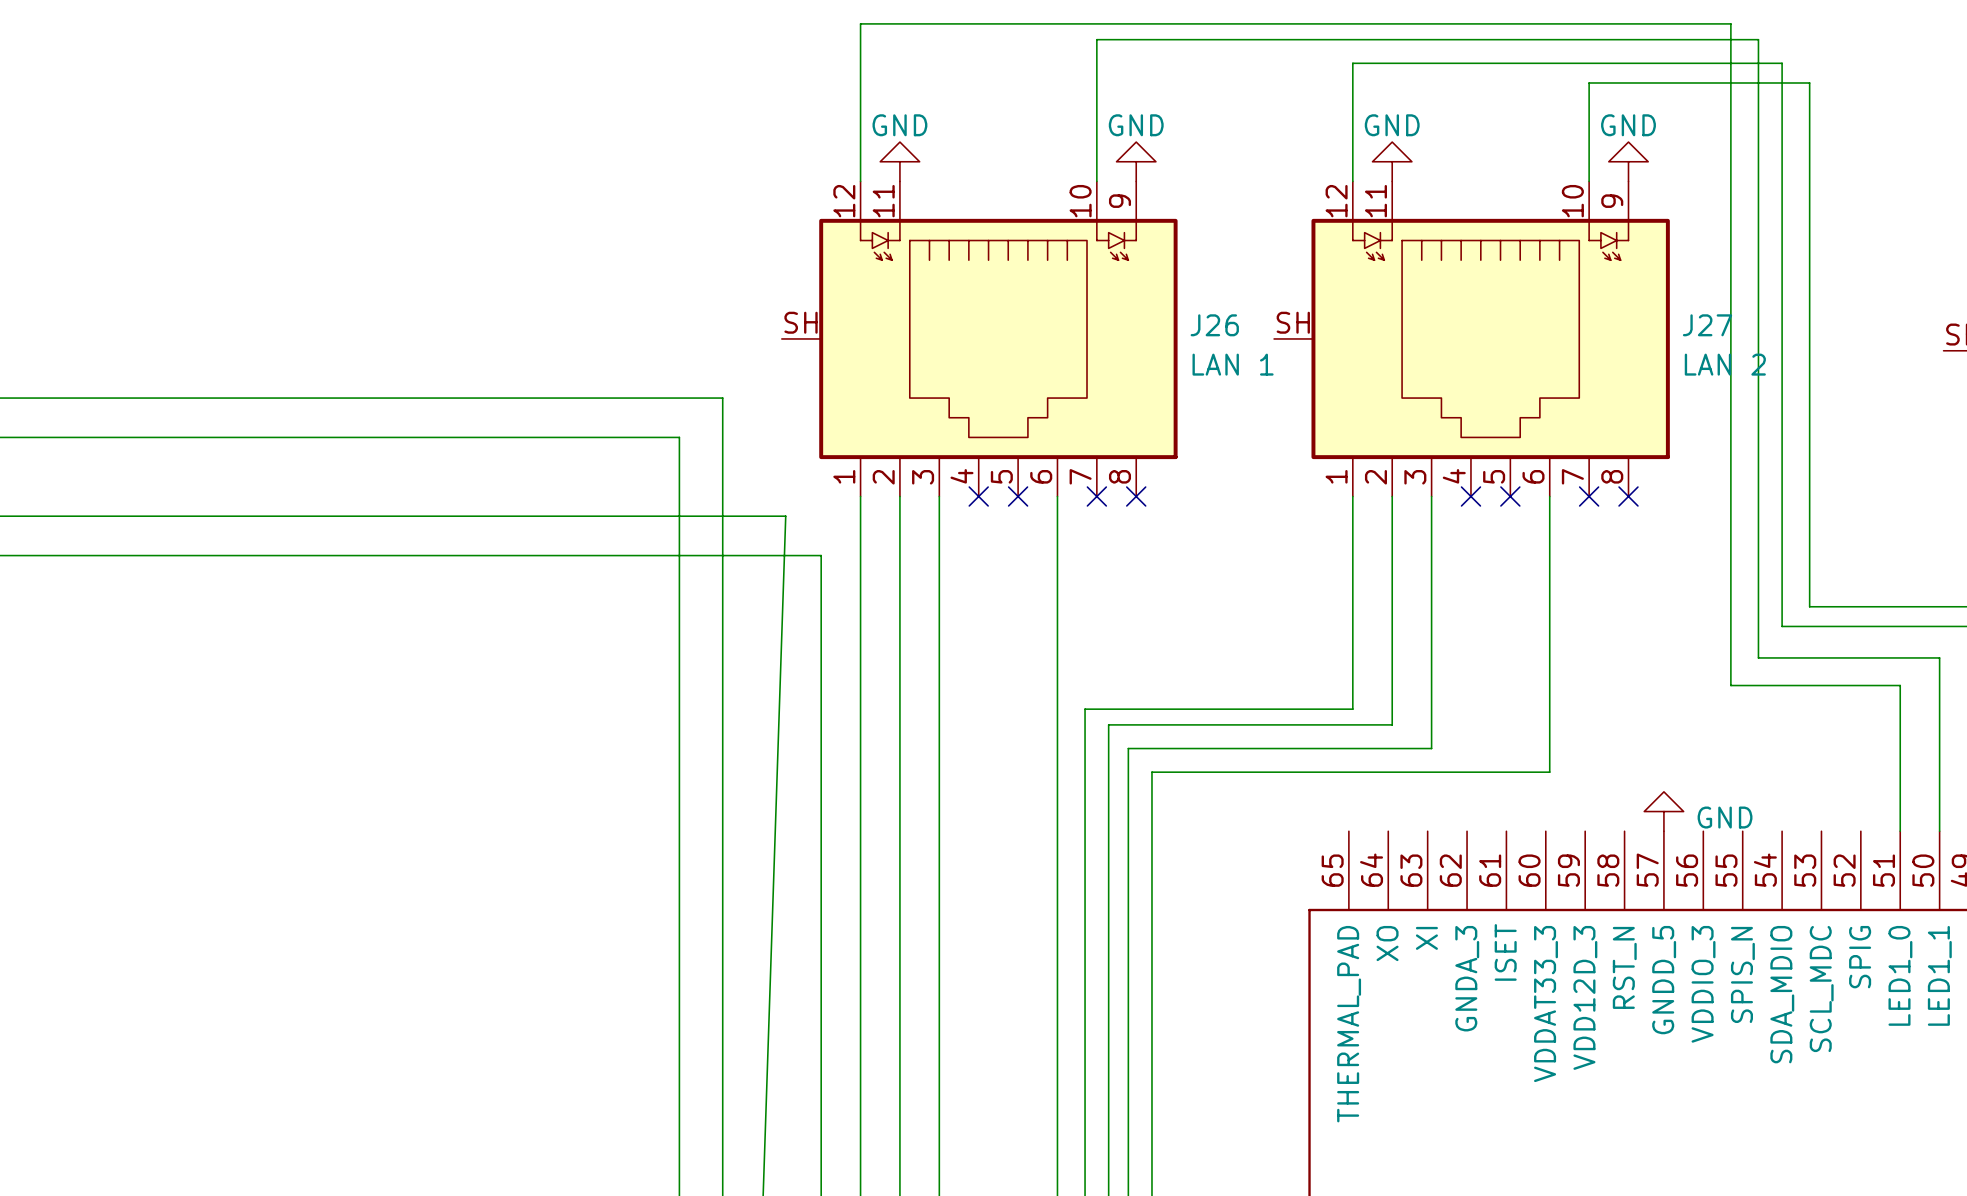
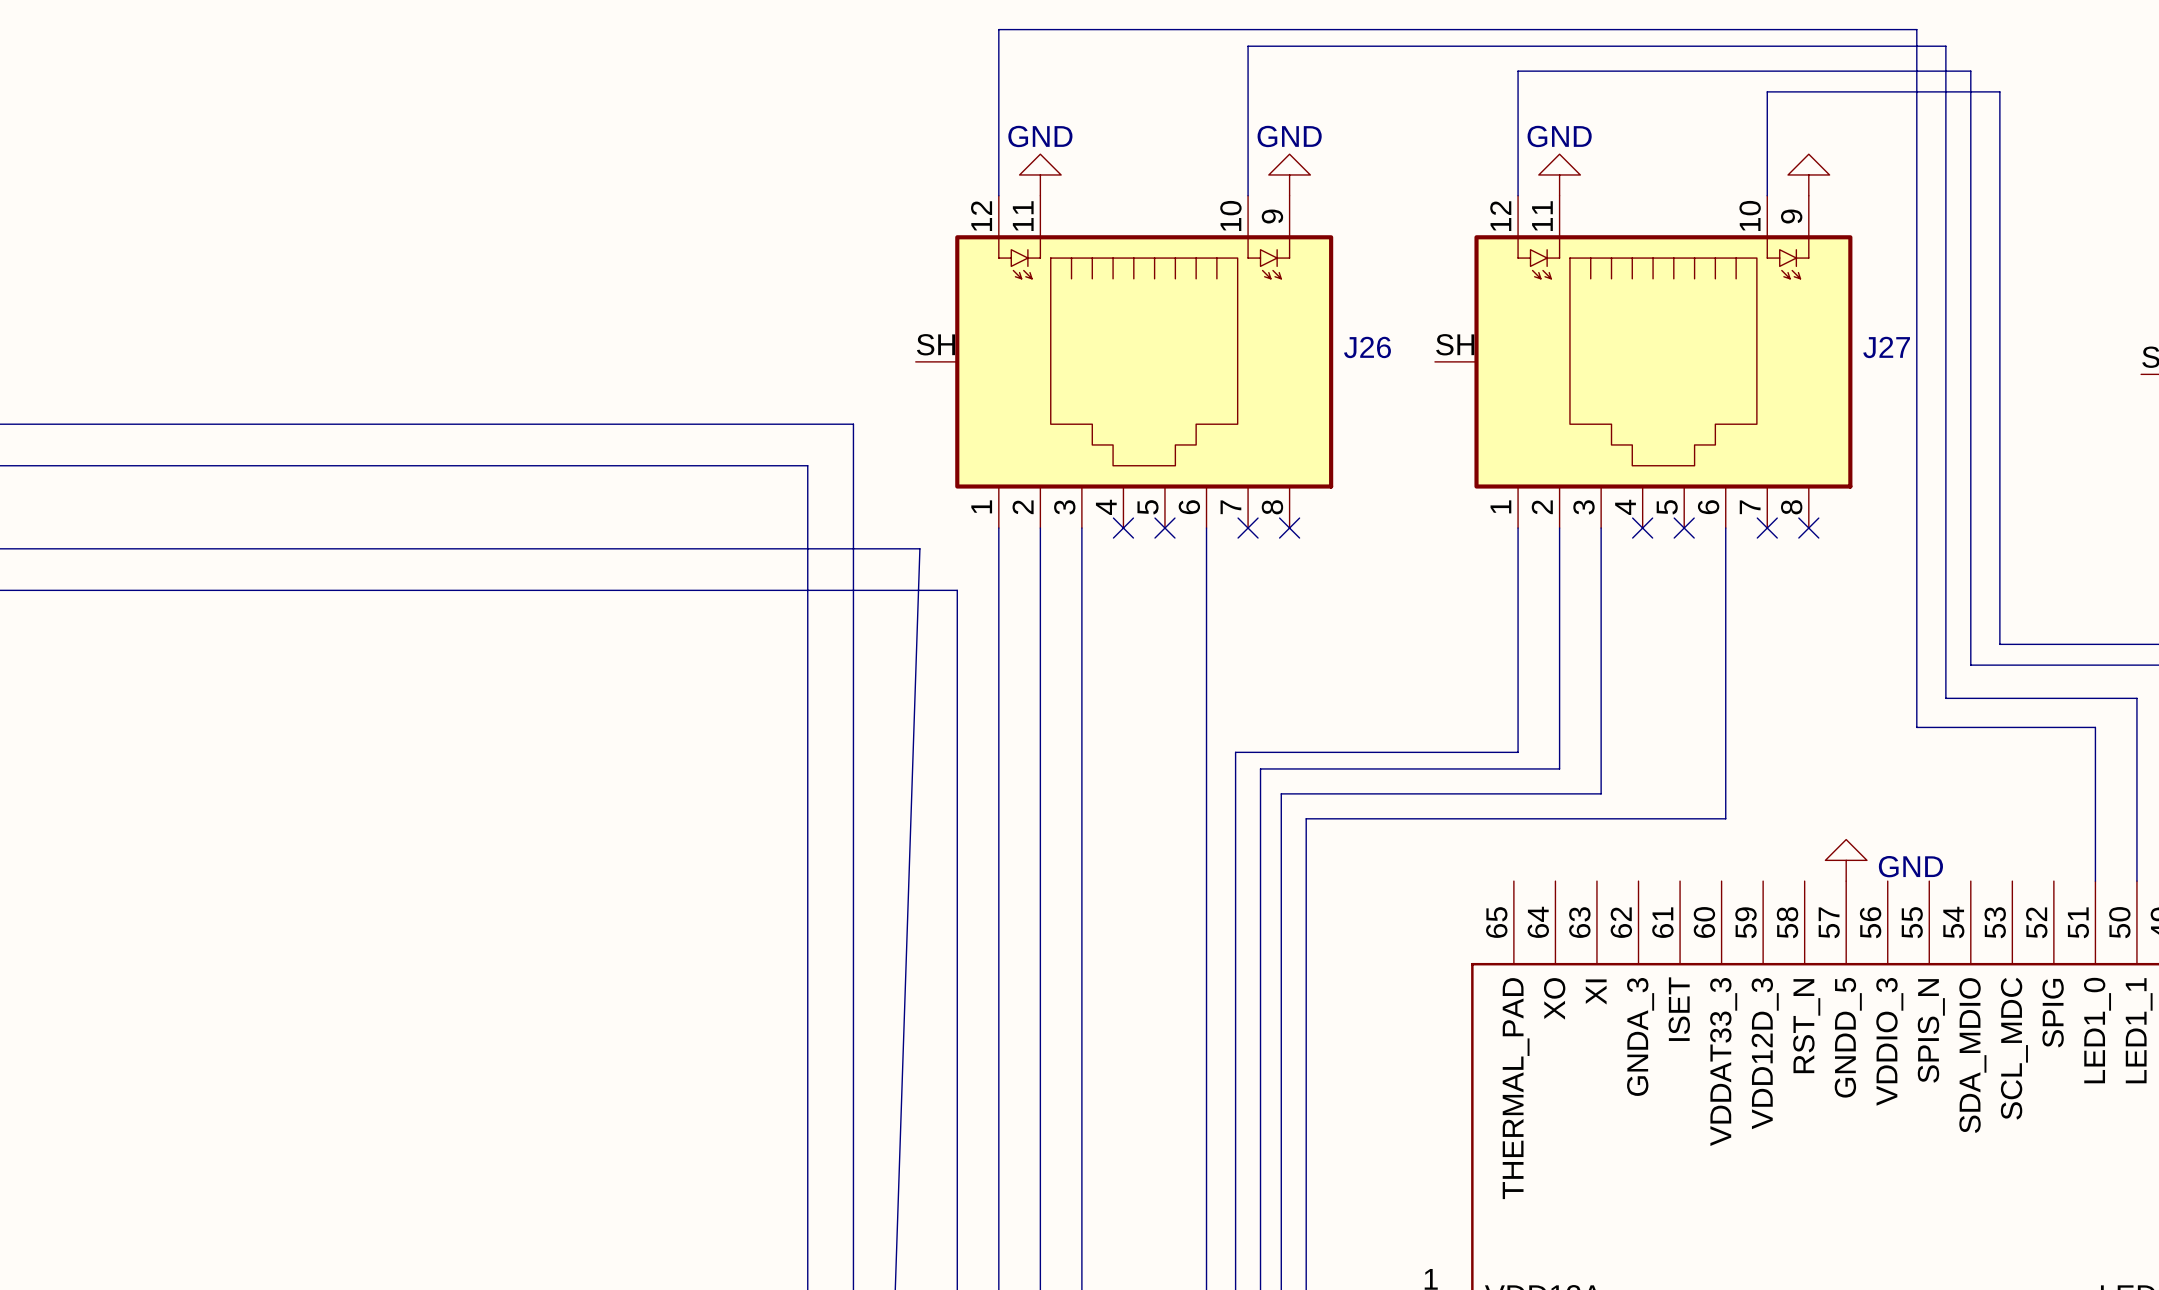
power symbol text: GND (1628, 125) -> none
J26 value: LAN 1 (1233, 364) -> none
J27 value: LAN 2 (1725, 364) -> none

